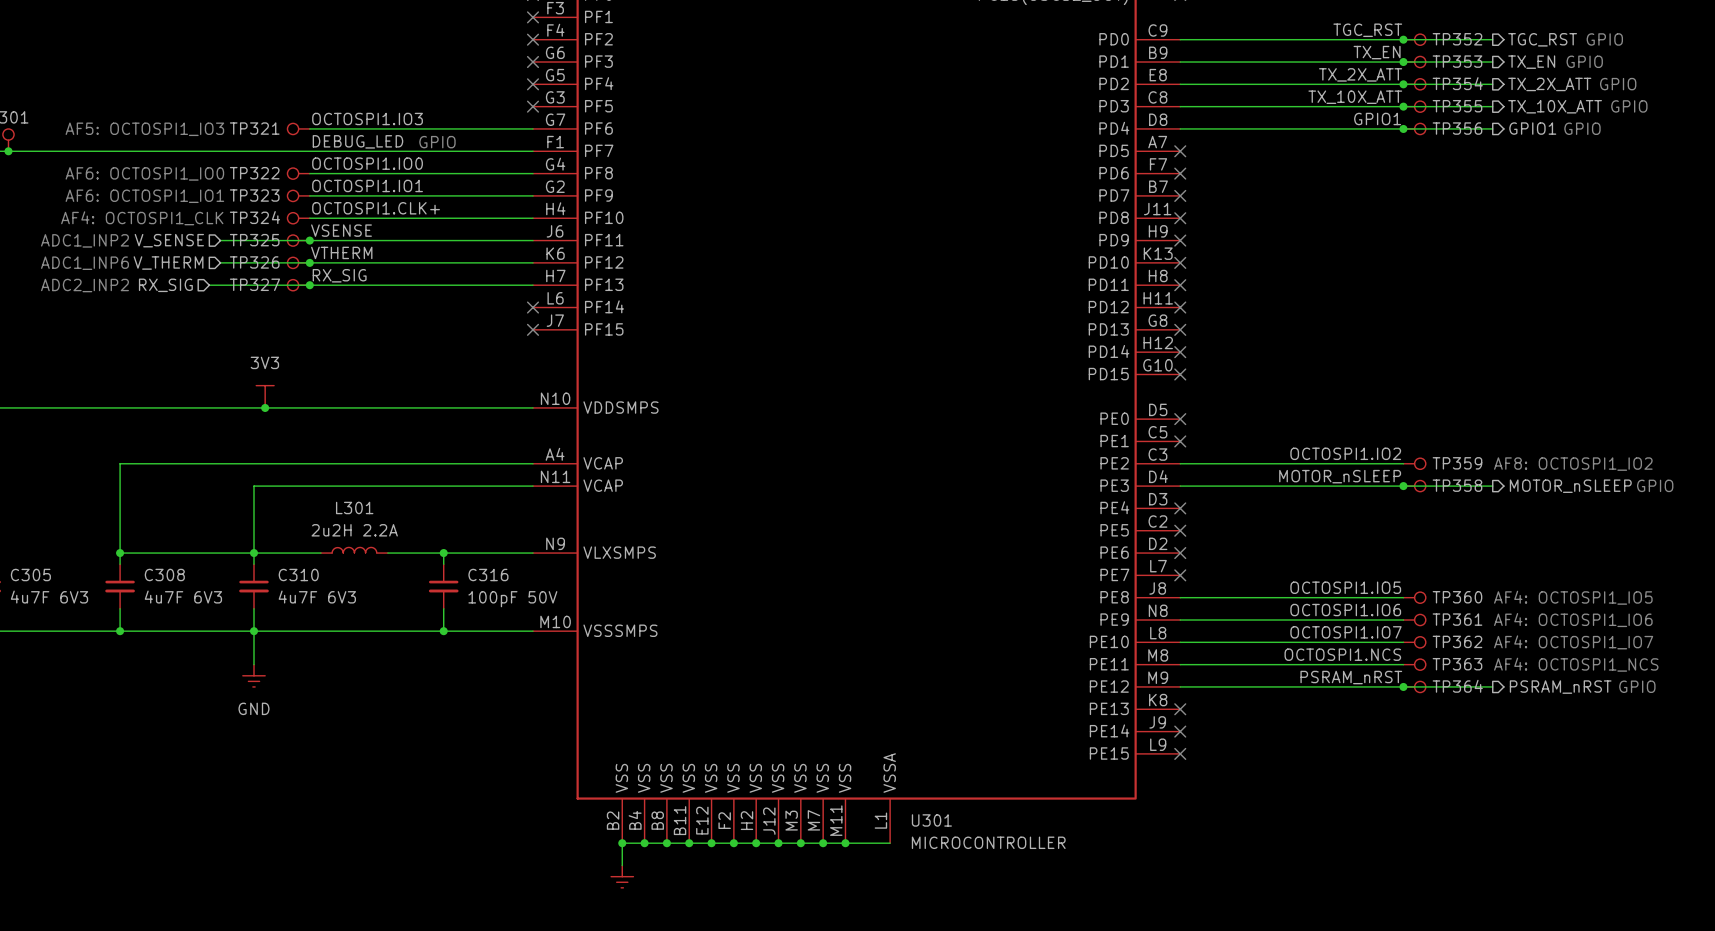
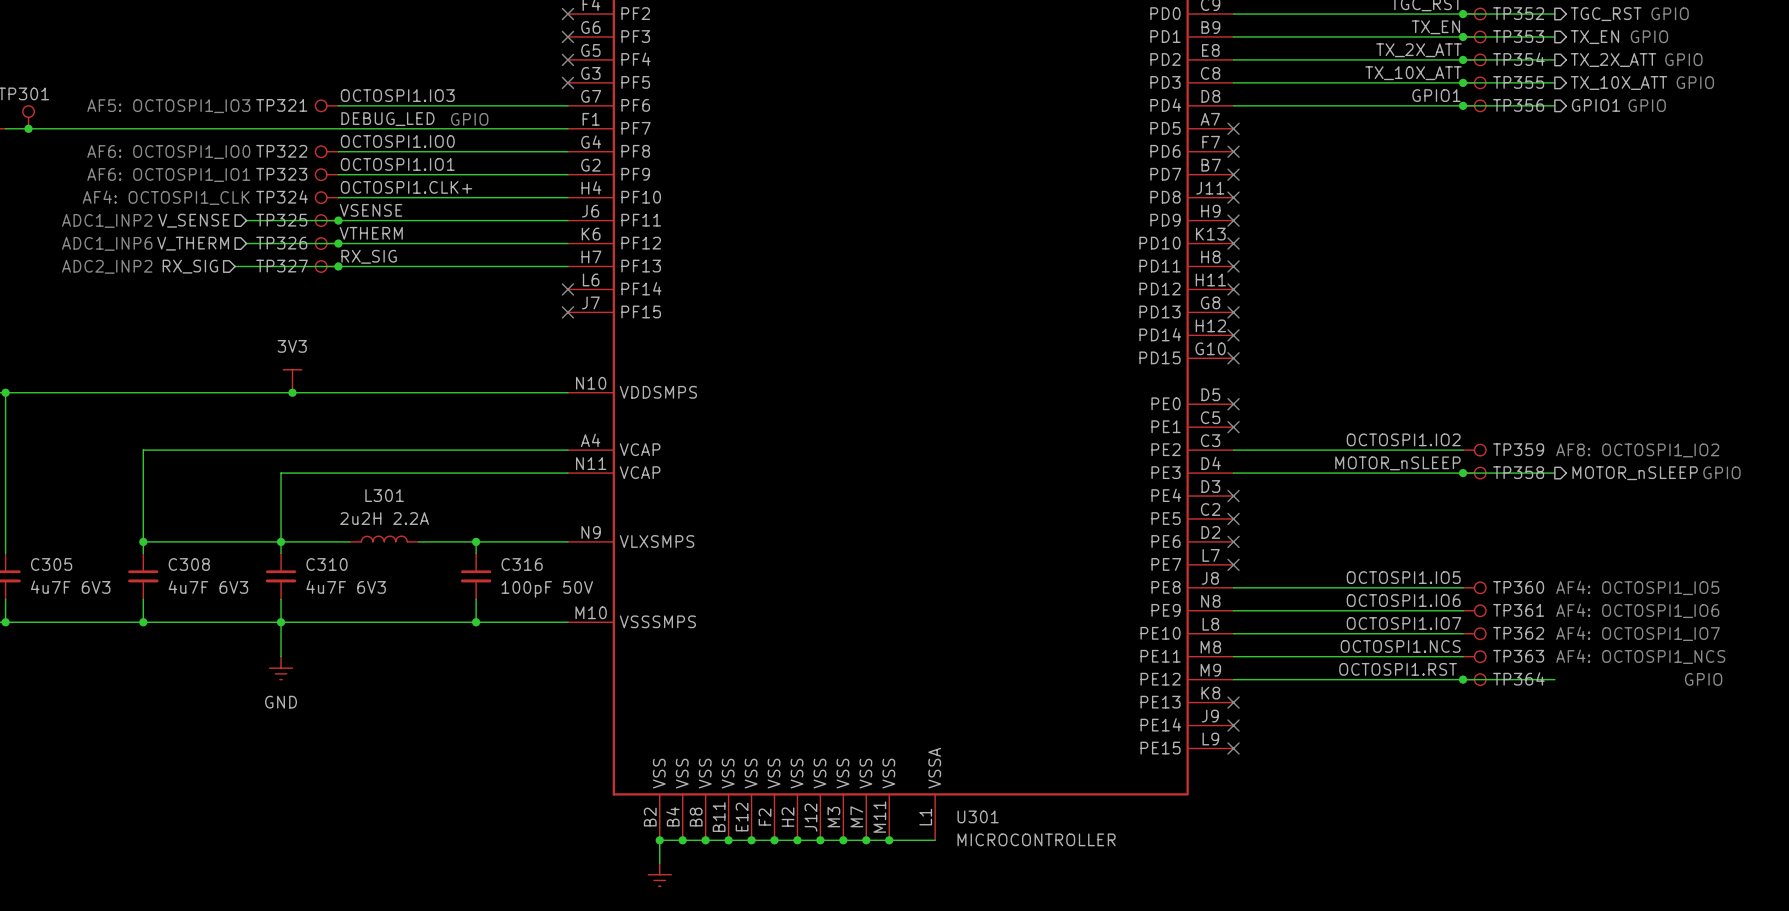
label: none -> OCTOSPI1.RST (1398, 669)
label: PSRAM_nRST (1351, 677) -> none
hierarchical label: PSRAM_nRST (1560, 687) -> none

